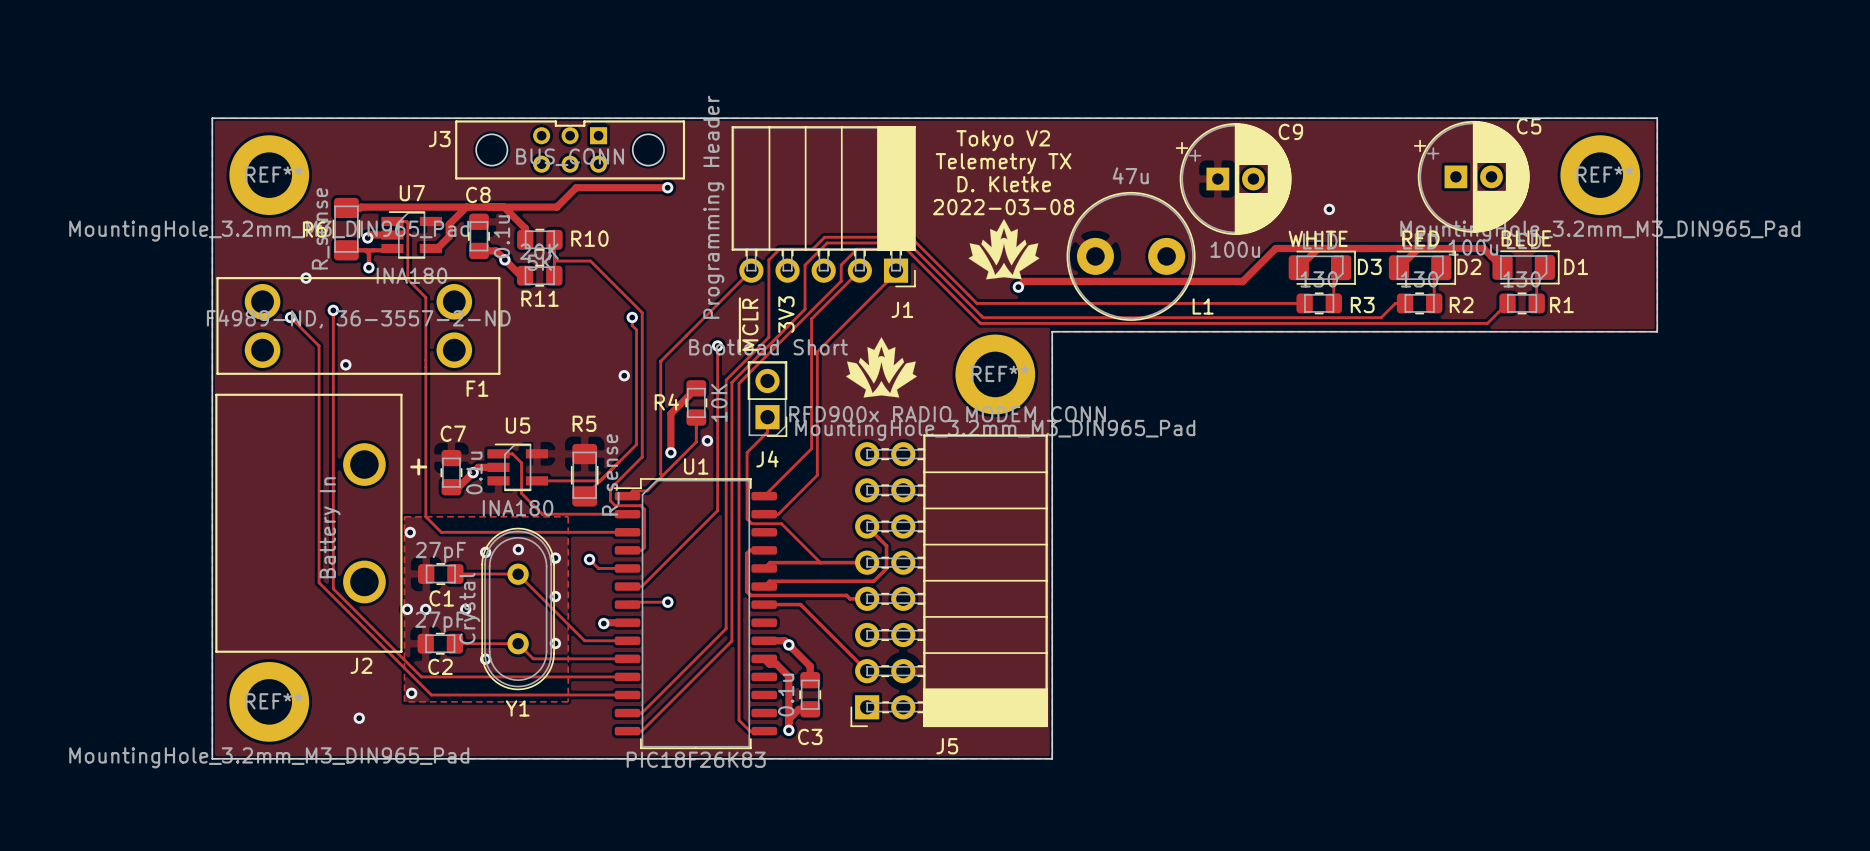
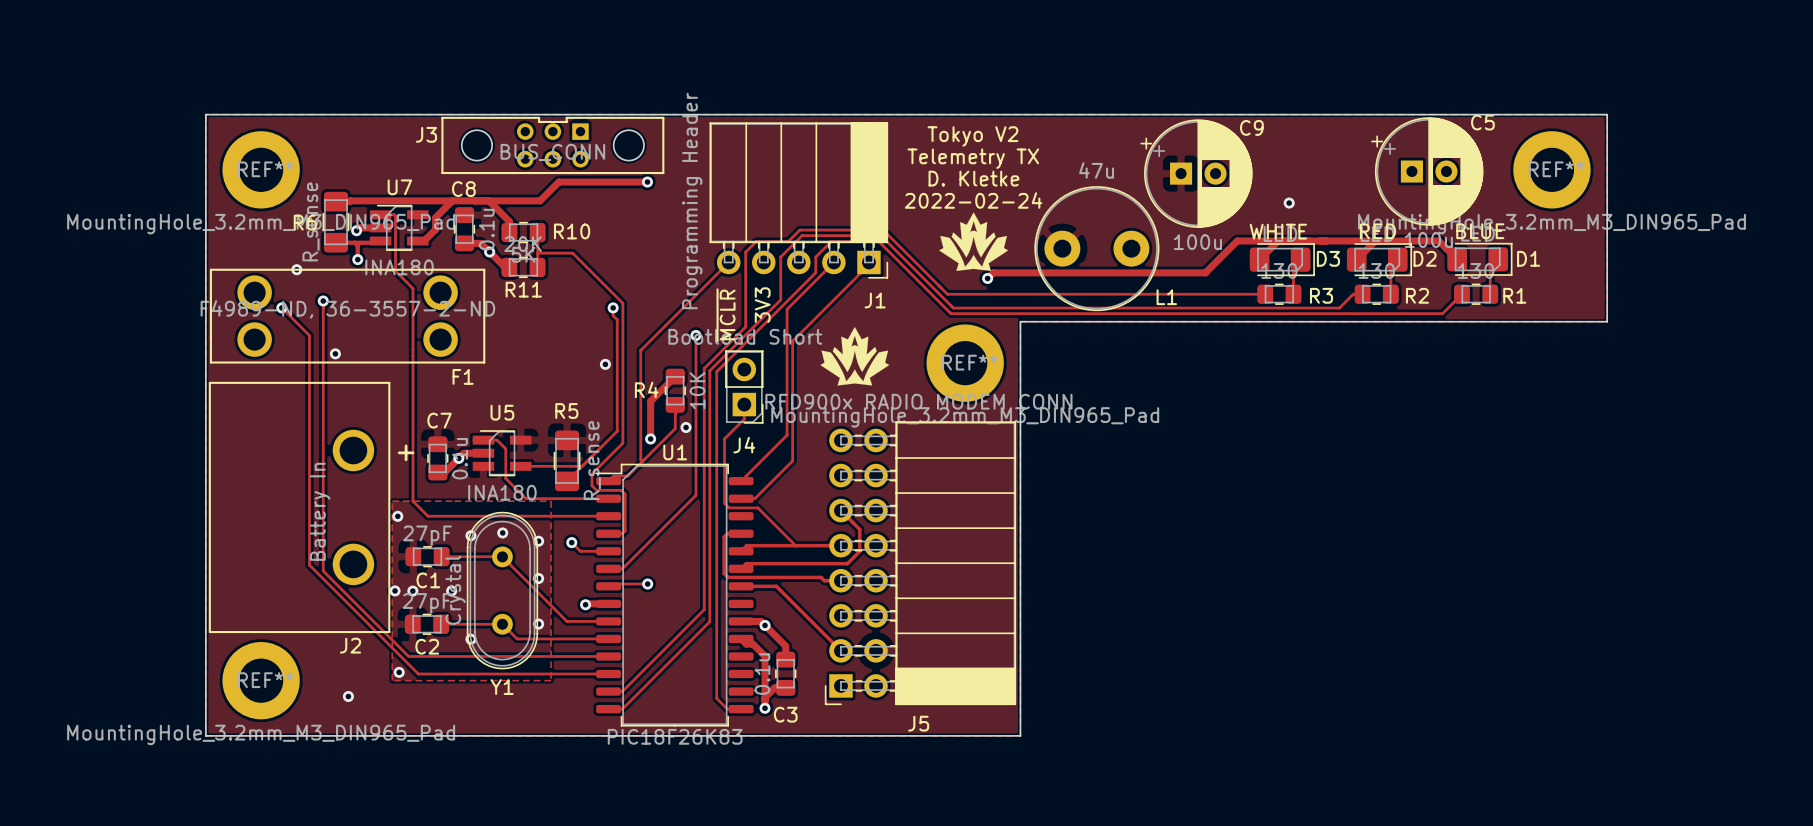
text: 2022-03-08 (1003, 207) -> 2022-02-24 (973, 200)

